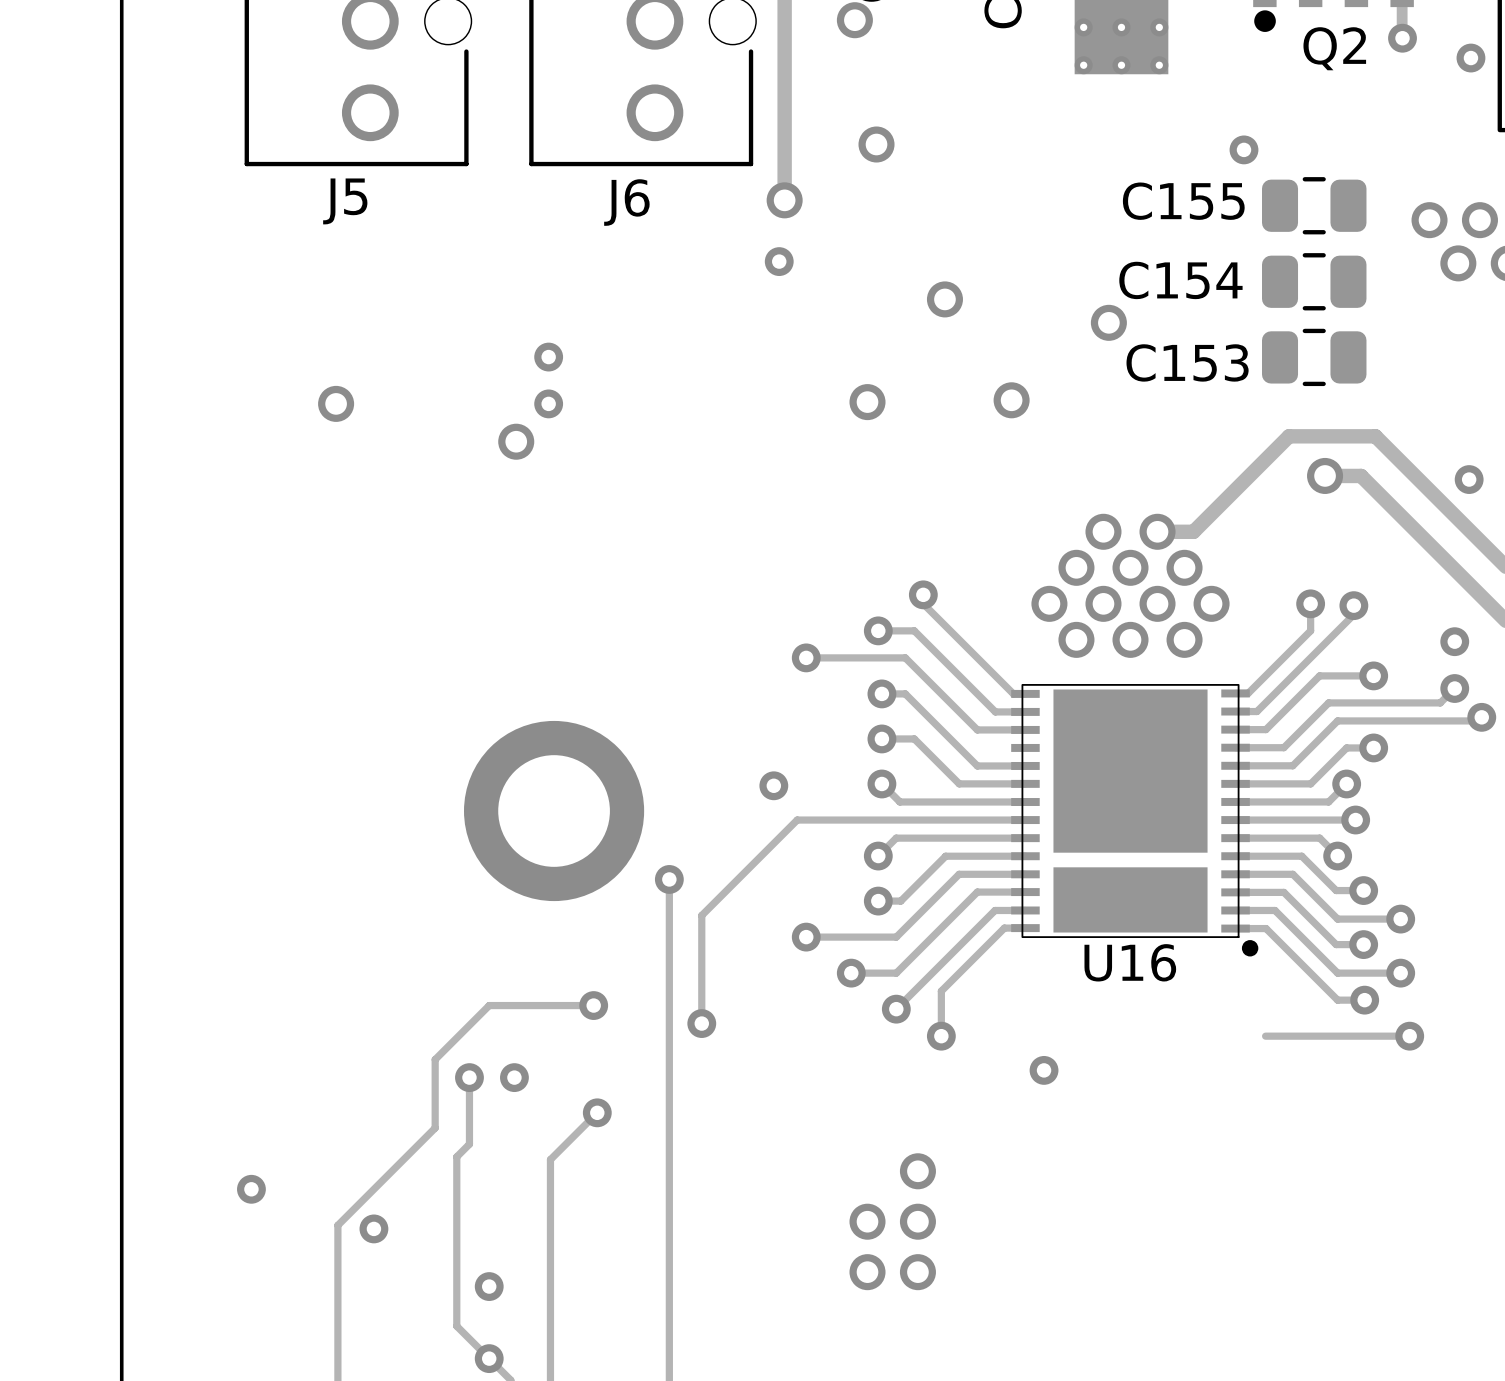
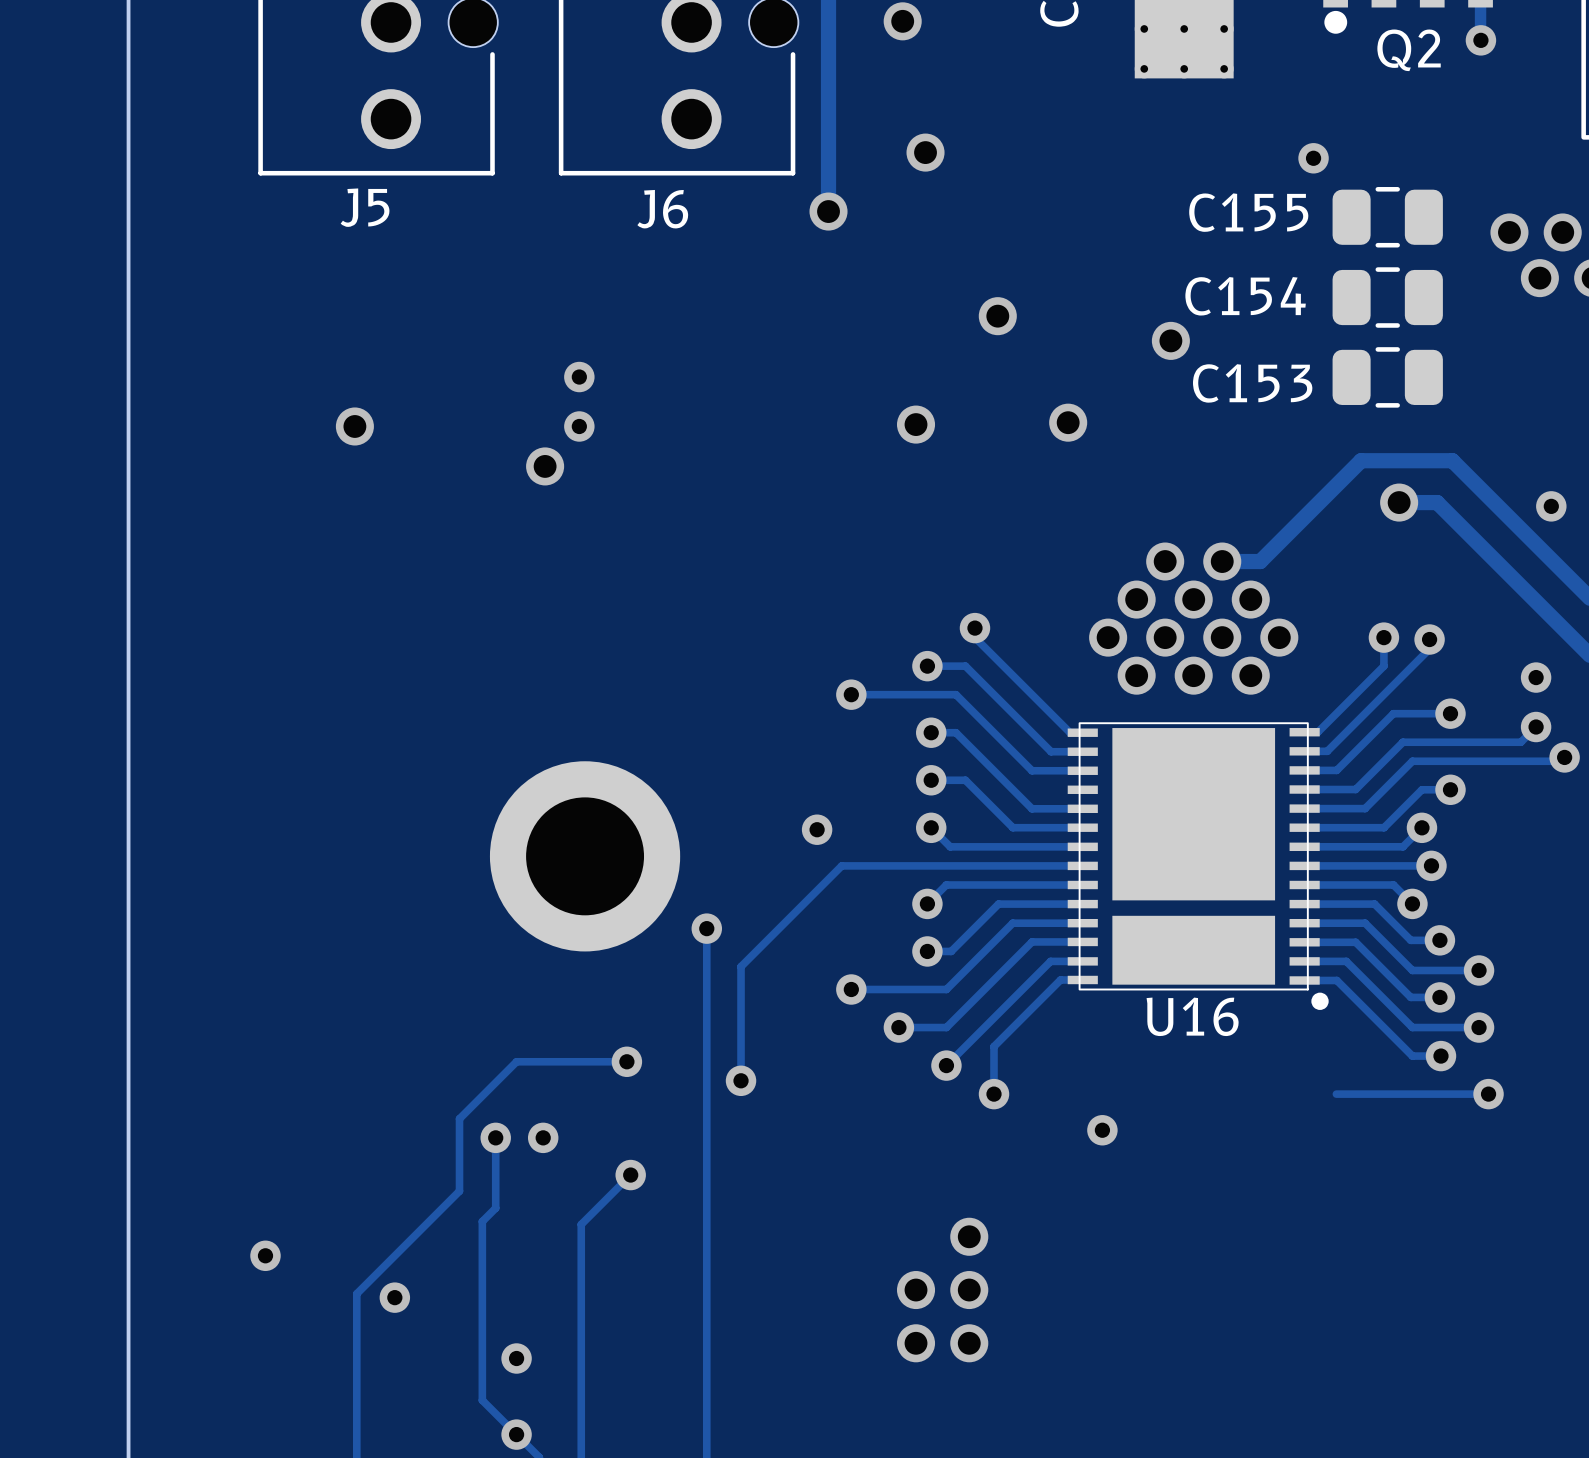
via: (1470, 58) -> none
via: (779, 261) -> none

